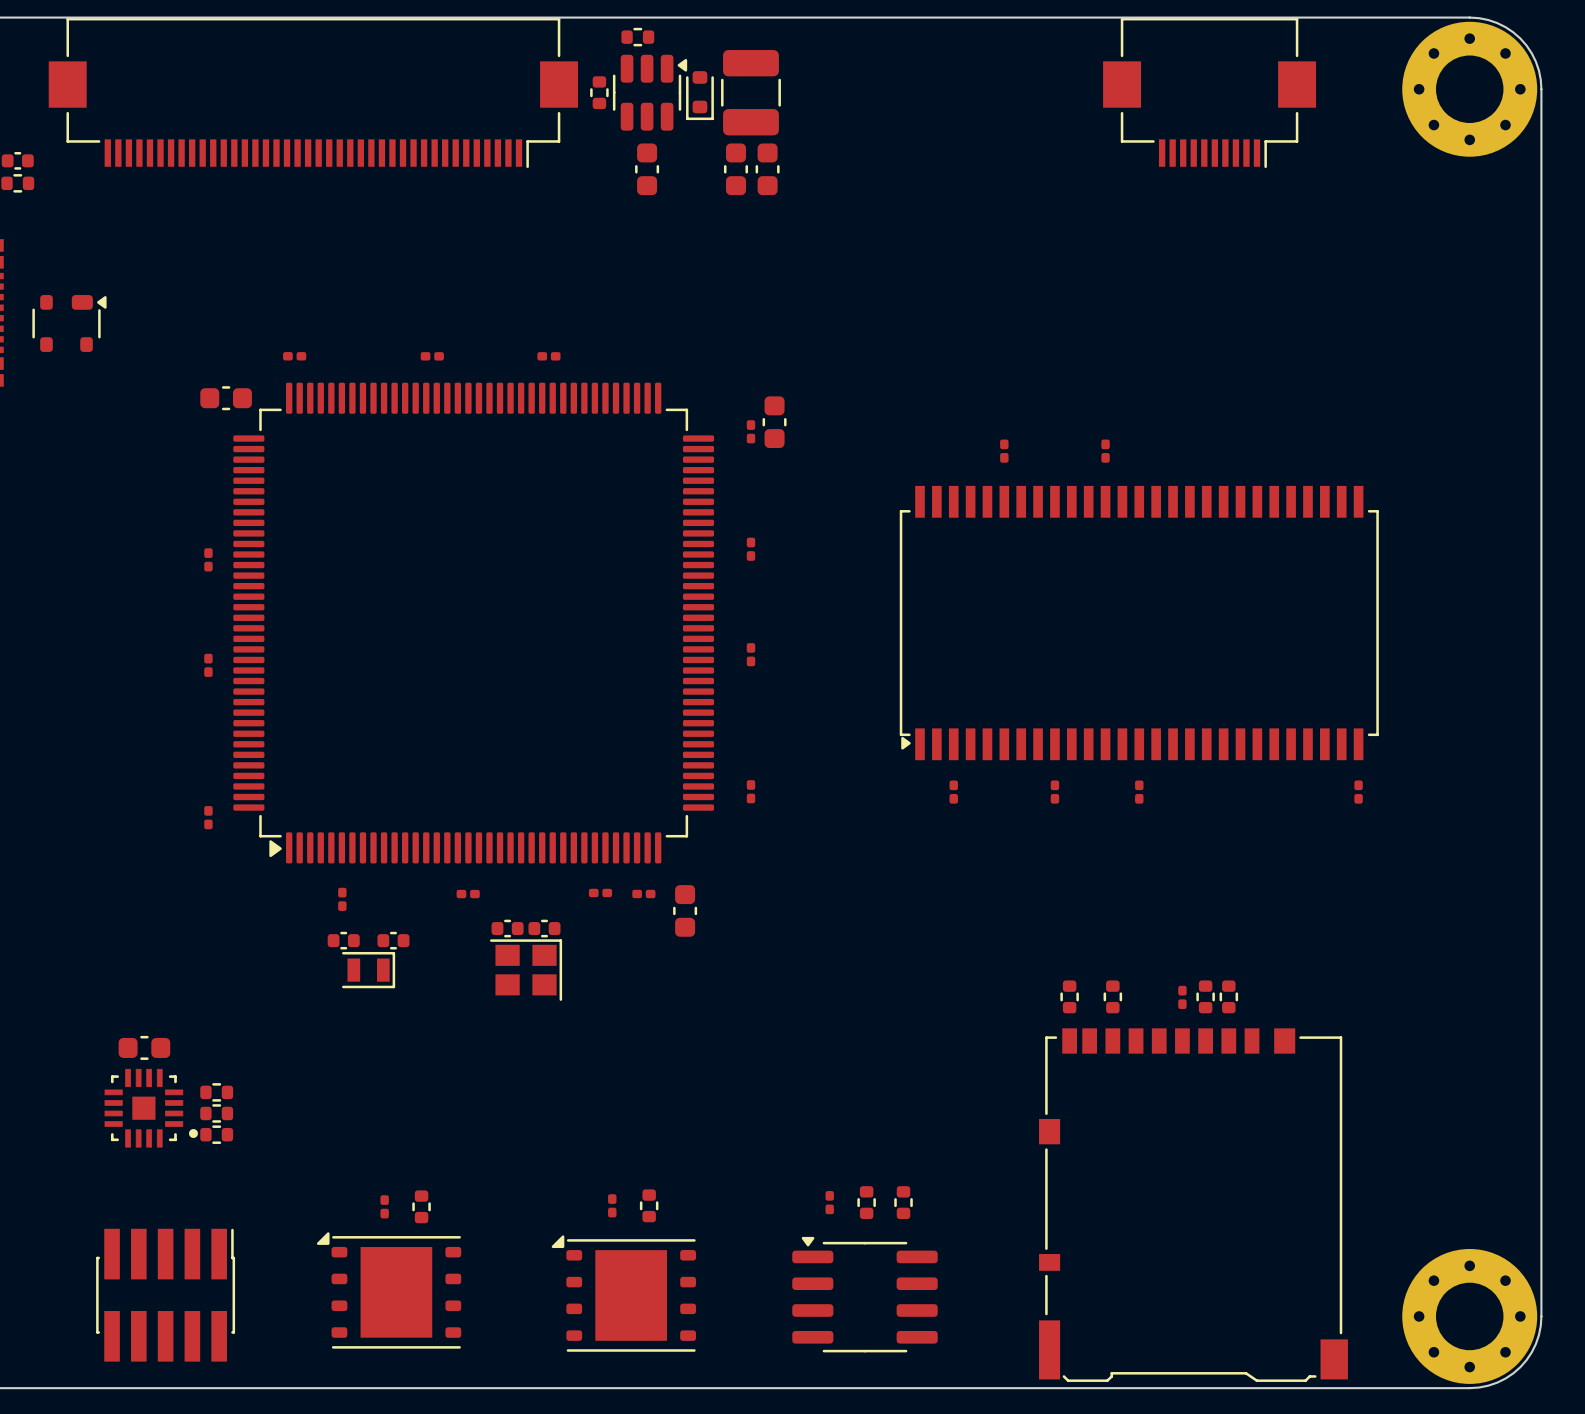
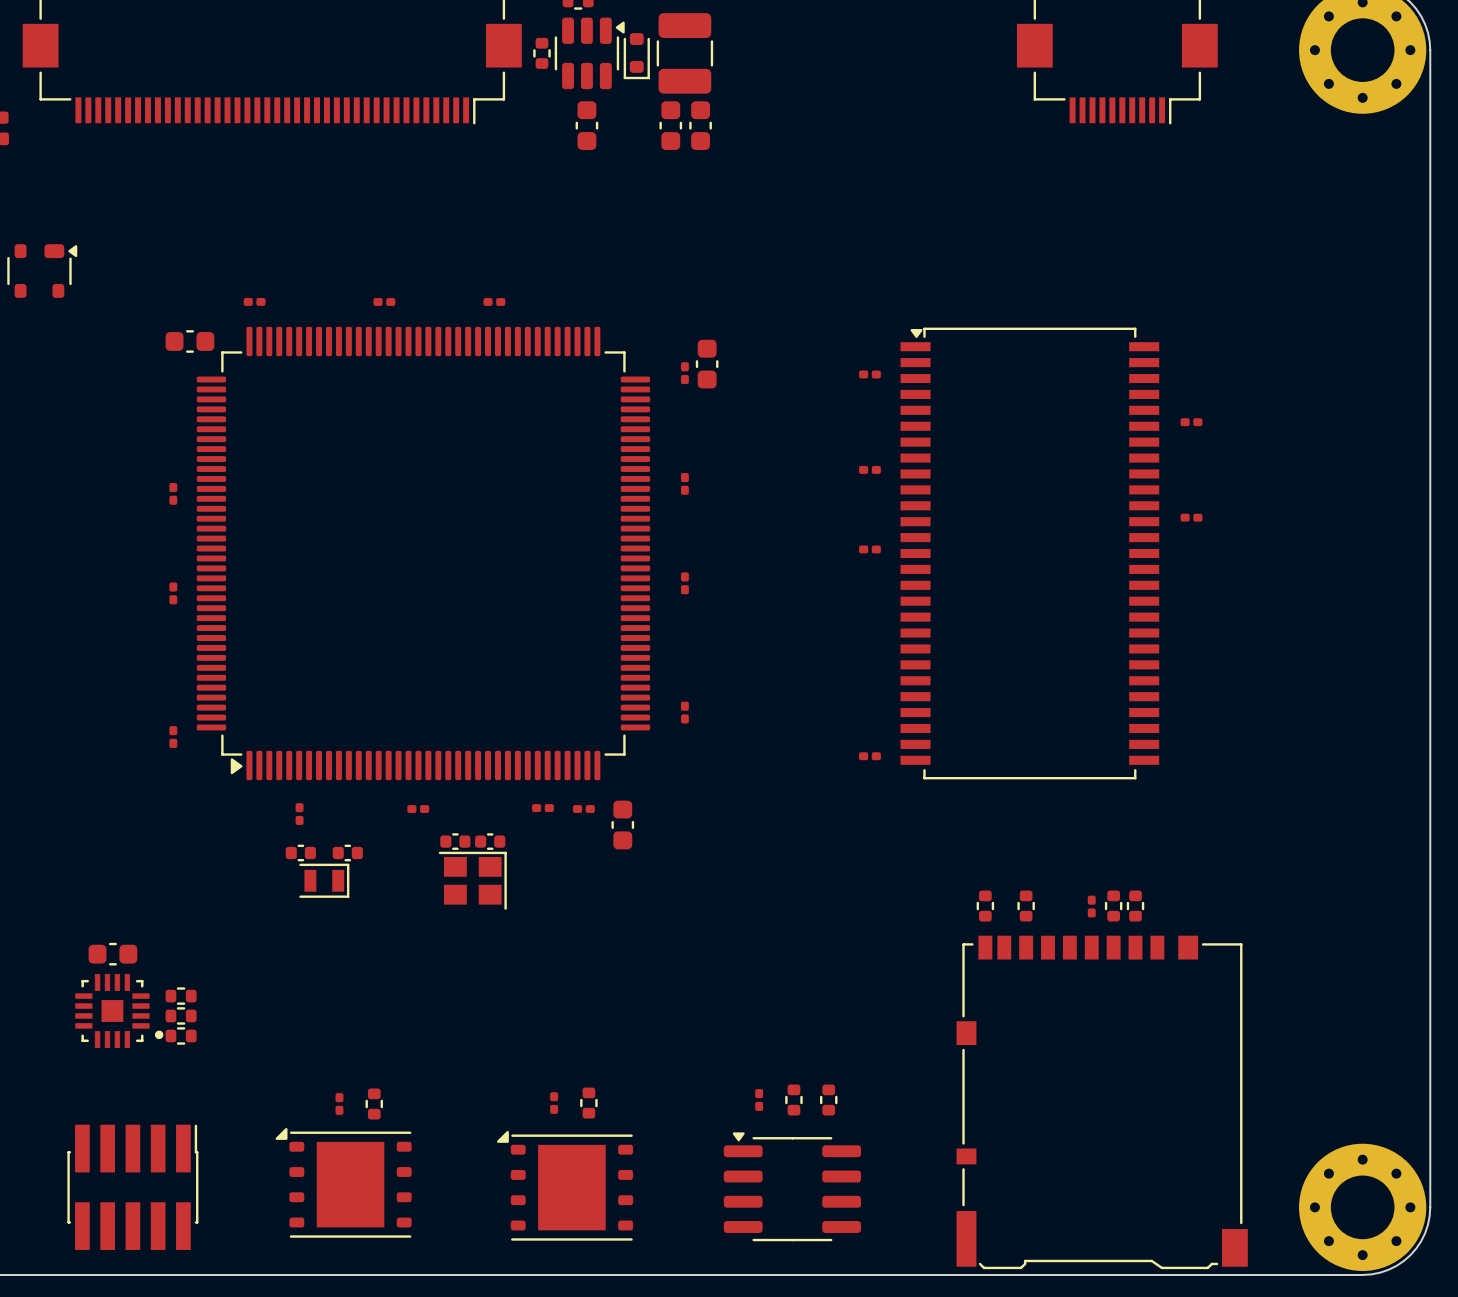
part: none -> (869, 374)
part: (1004, 451) -> none
part: (1105, 451) -> none
part: none -> (1191, 422)
part: none -> (869, 469)
part: none -> (1191, 517)
part: none -> (869, 549)
part rotation: 0° (1139, 623) -> 90° clockwise (1029, 553)
part rotation: 0° (953, 792) -> 90° clockwise (869, 756)
part position: (953, 792) -> (869, 756)
part: (1054, 792) -> none
part: (1139, 792) -> none
part: (1358, 792) -> none

